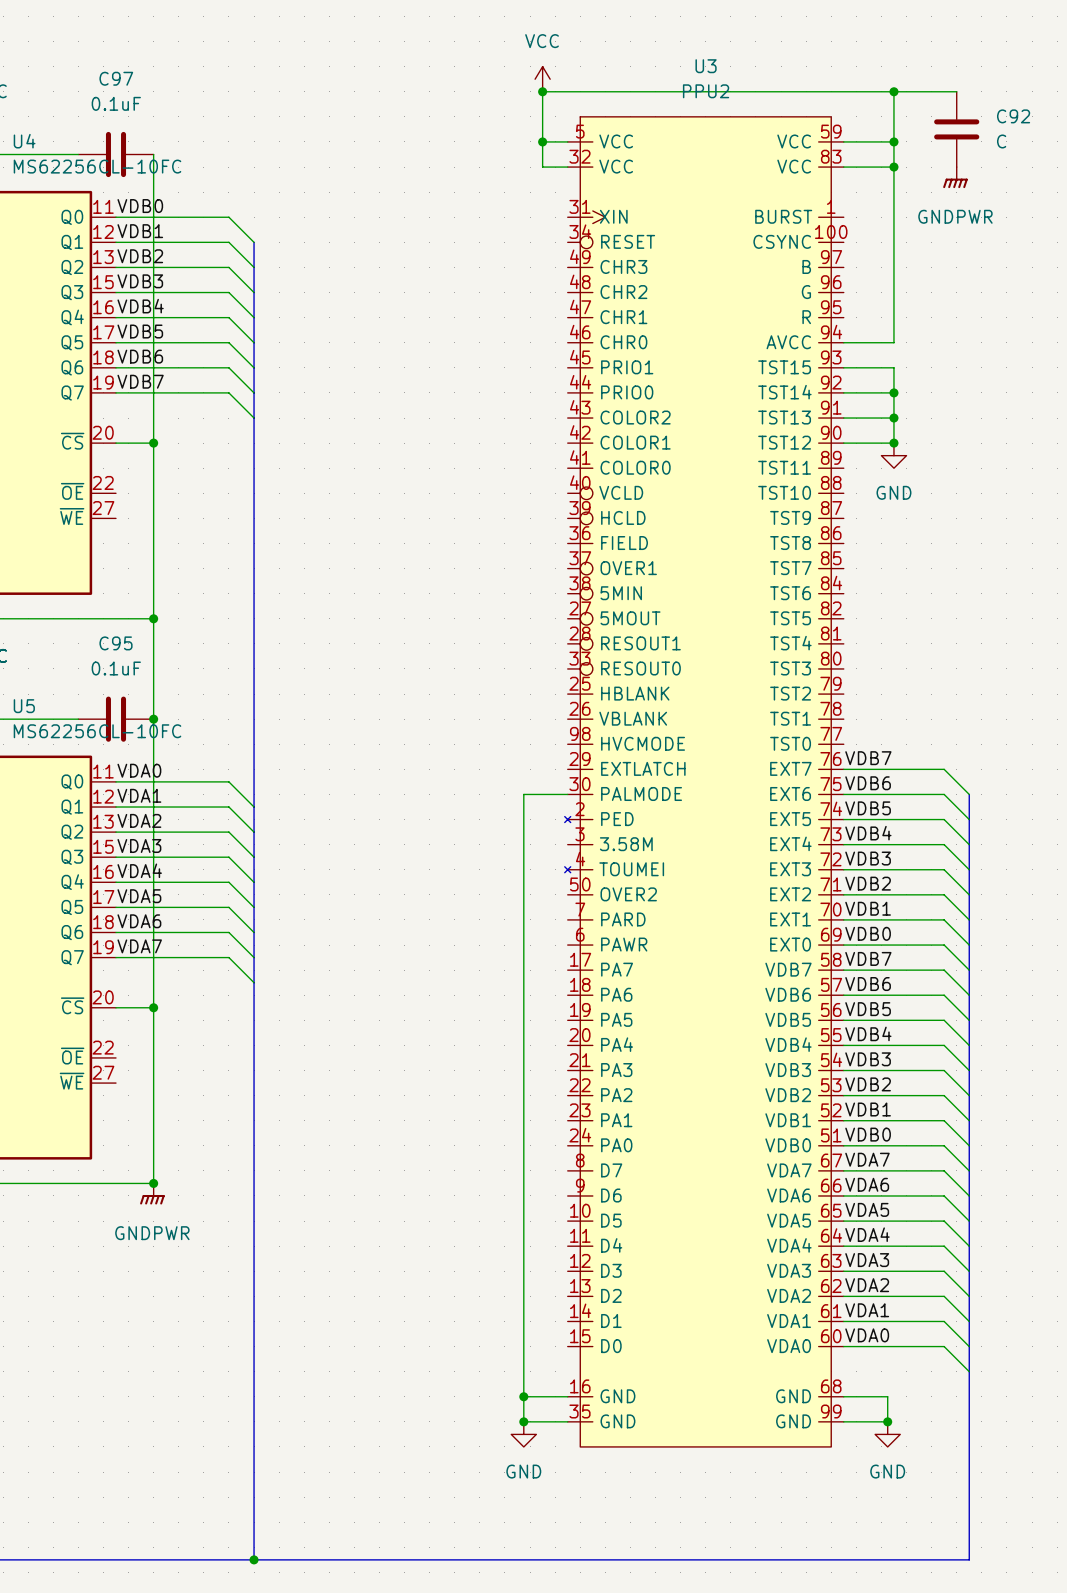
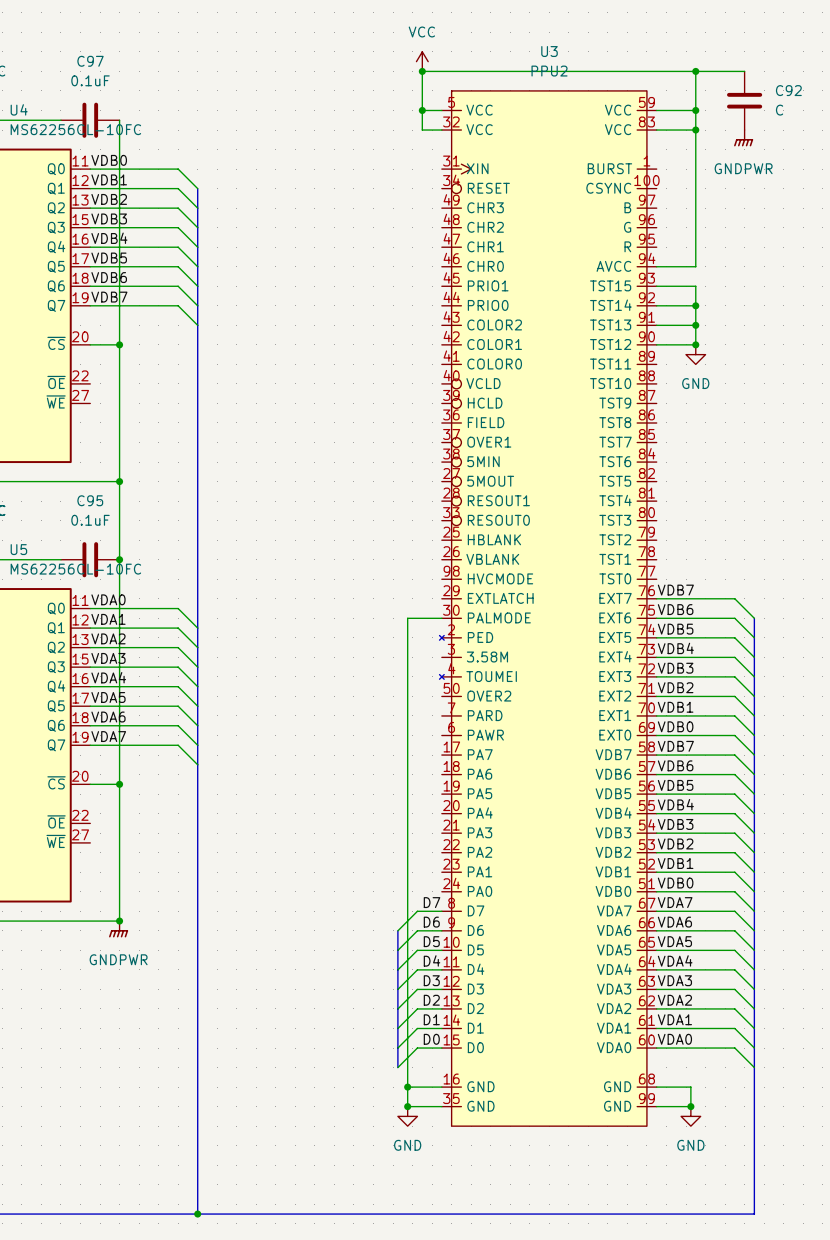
label: none -> D7 (432, 902)
wire: none -> (441, 911) (417, 911) (397, 930)
label: none -> D6 (431, 922)
bus: none -> (397, 930) (397, 1067)
wire: none -> (441, 930) (417, 930) (397, 950)
label: none -> D5 (431, 941)
wire: none -> (441, 950) (417, 950) (397, 969)
label: none -> D4 (432, 960)
wire: none -> (441, 969) (417, 969) (397, 989)
label: none -> D3 (431, 980)
wire: none -> (441, 989) (417, 989) (397, 1008)
label: none -> D2 (431, 1000)
wire: none -> (441, 1008) (417, 1008) (397, 1028)
label: none -> D1 (431, 1019)
wire: none -> (441, 1028) (417, 1028) (397, 1048)
label: none -> D0 (431, 1039)
wire: none -> (441, 1048) (417, 1048) (397, 1067)

